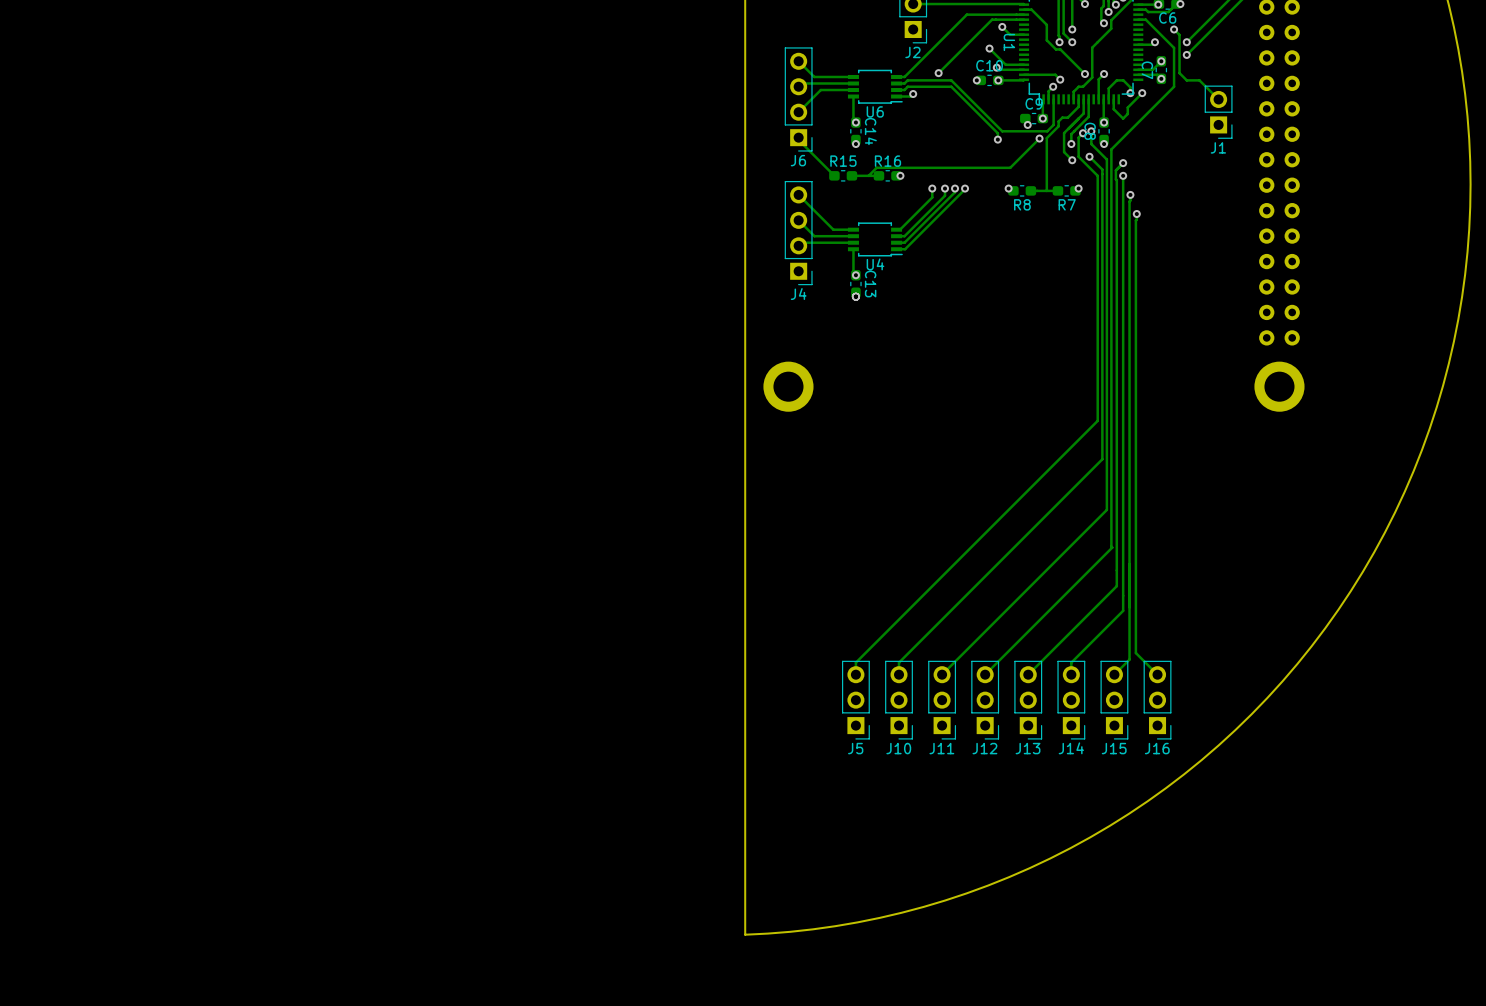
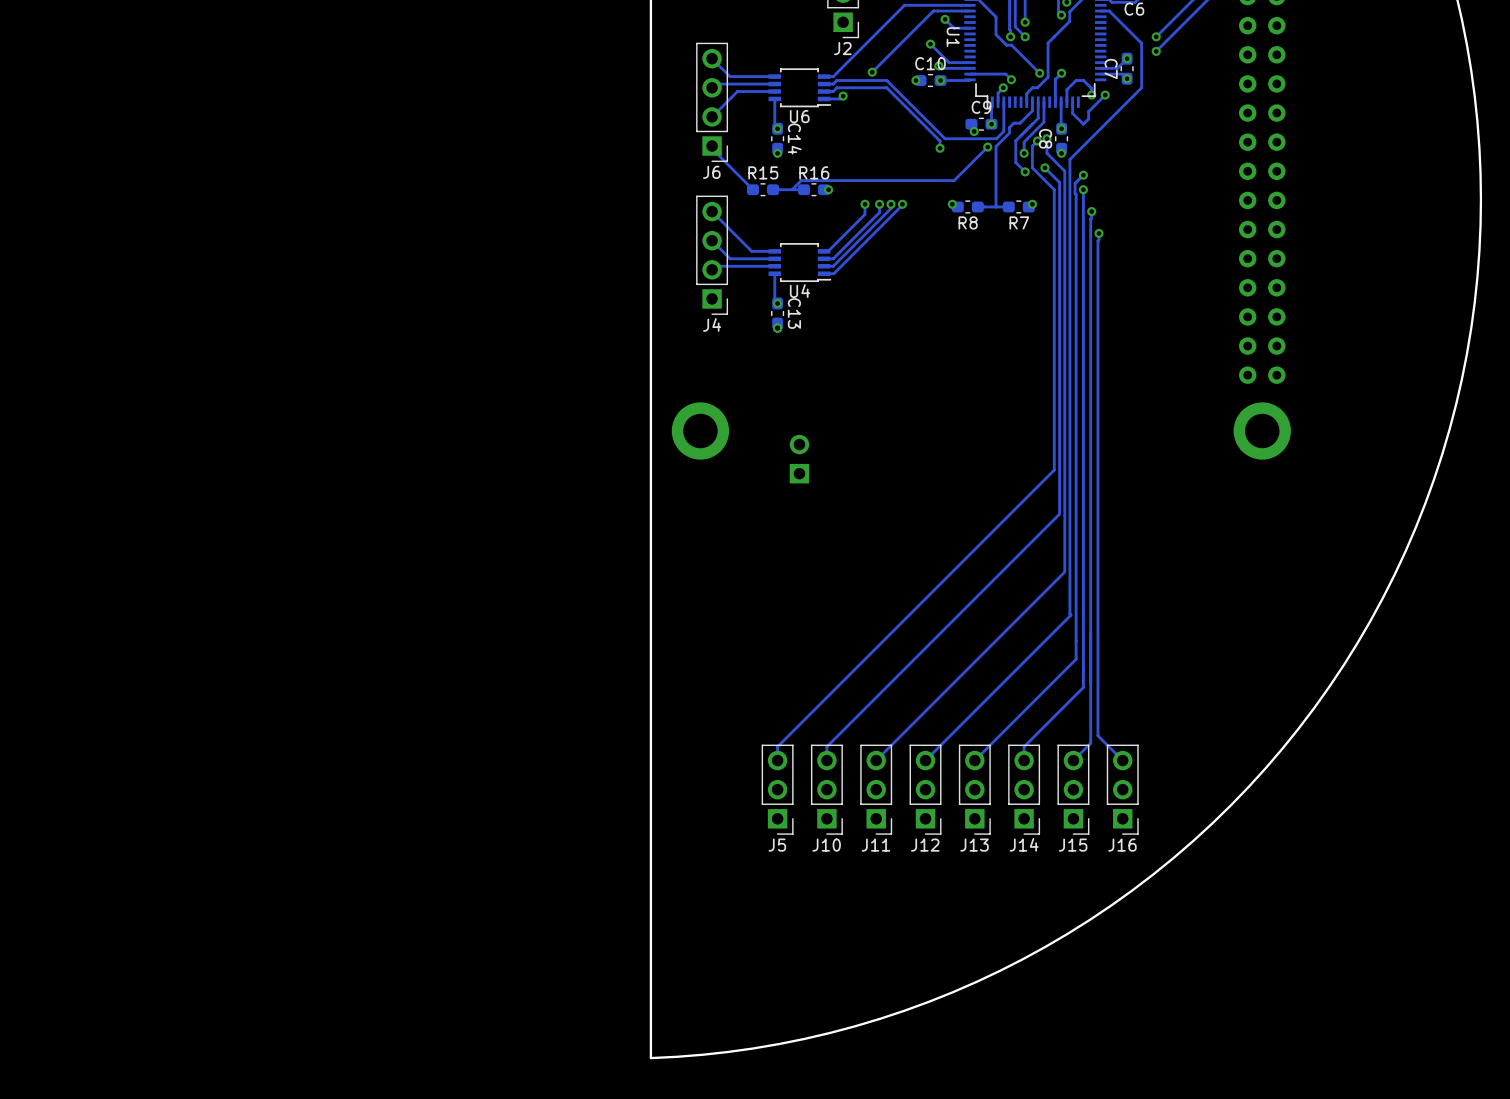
track: (1174, 29) (1179, 34) (1179, 73) (1186, 80) (1199, 80) (1218, 99) -> none
via: (1174, 29) -> none
track: (1154, 42) (1152, 44) (1138, 44) -> none
via: (1154, 42) -> none
J1: (1218, 112) -> none
part: none -> (799, 459)

